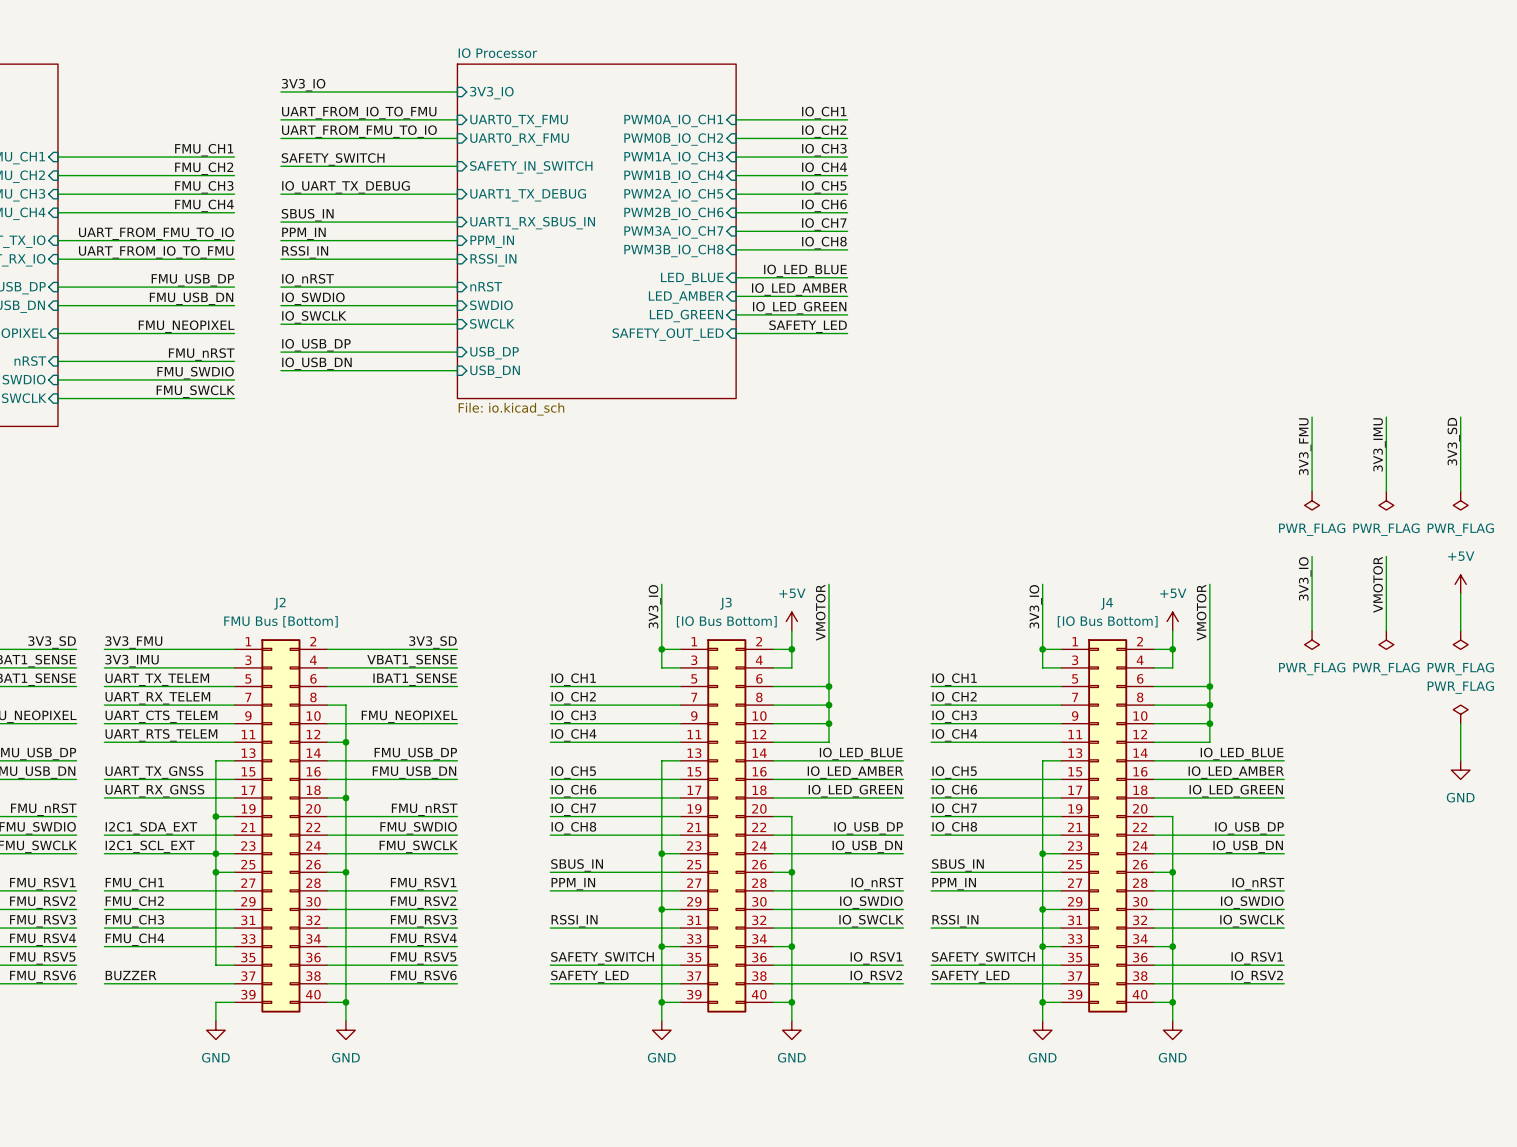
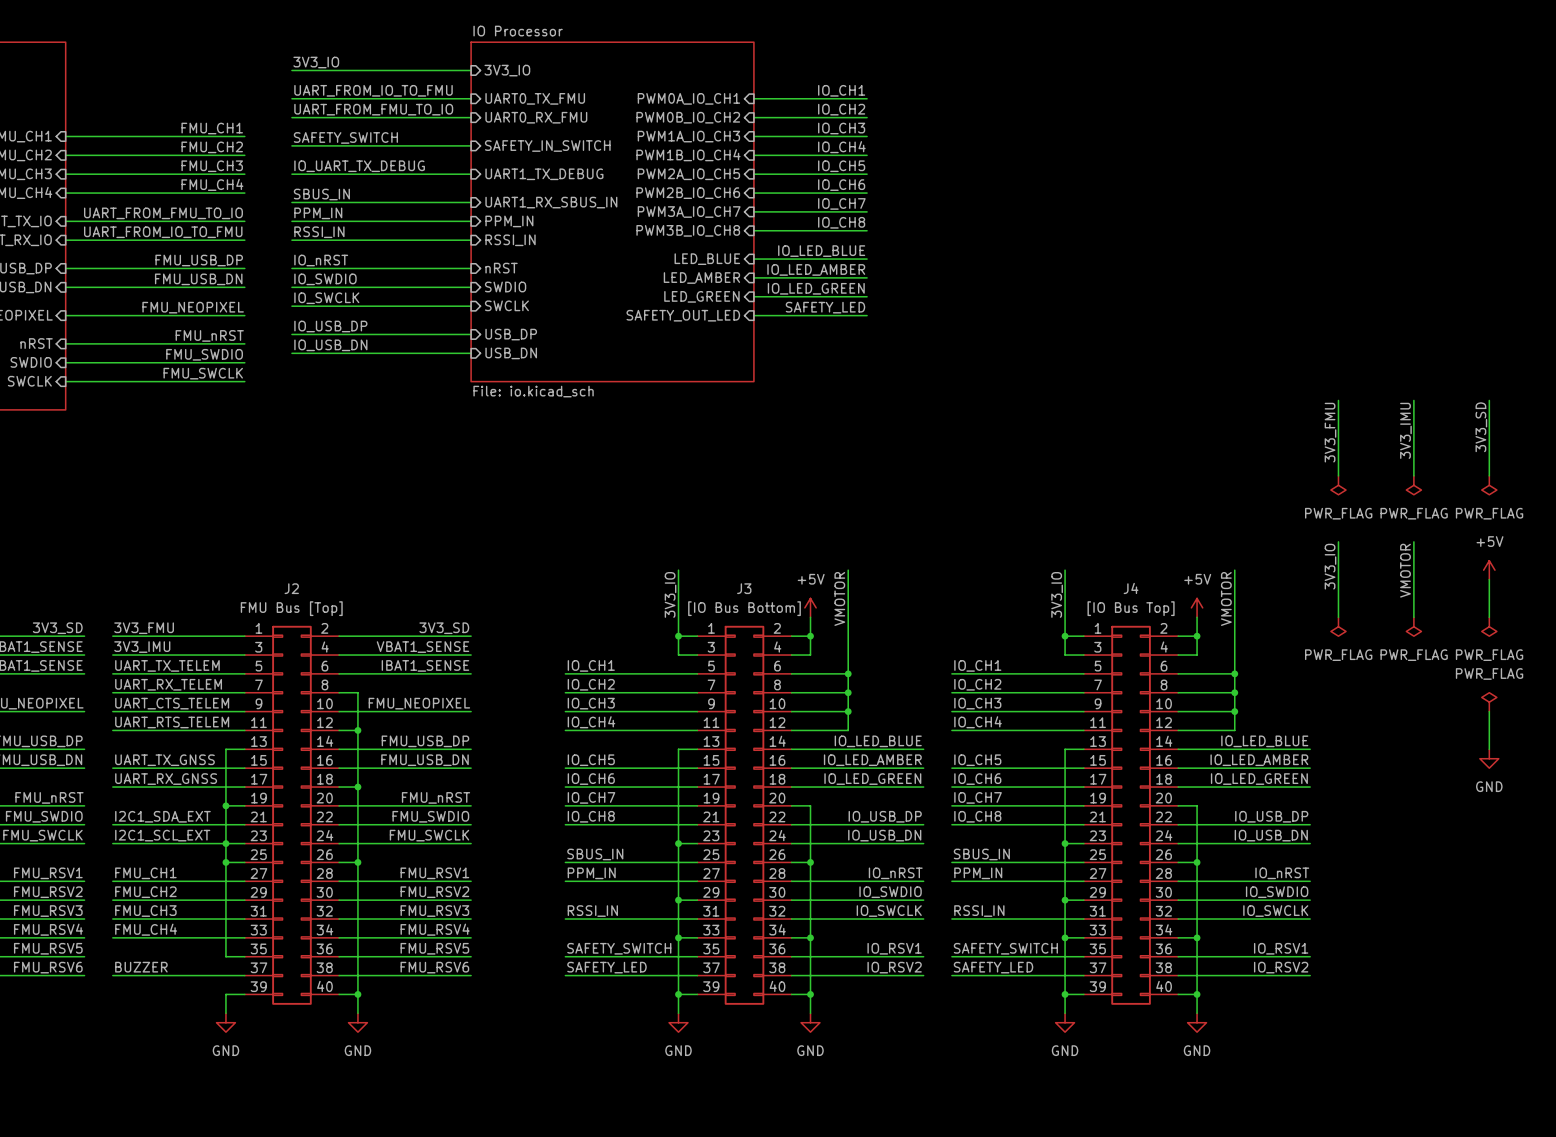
J2 value: FMU Bus [Bottom] (281, 621) -> FMU Bus [Top] (291, 608)
J4 value: [IO Bus Bottom] (1107, 621) -> [IO Bus Top] (1131, 608)

